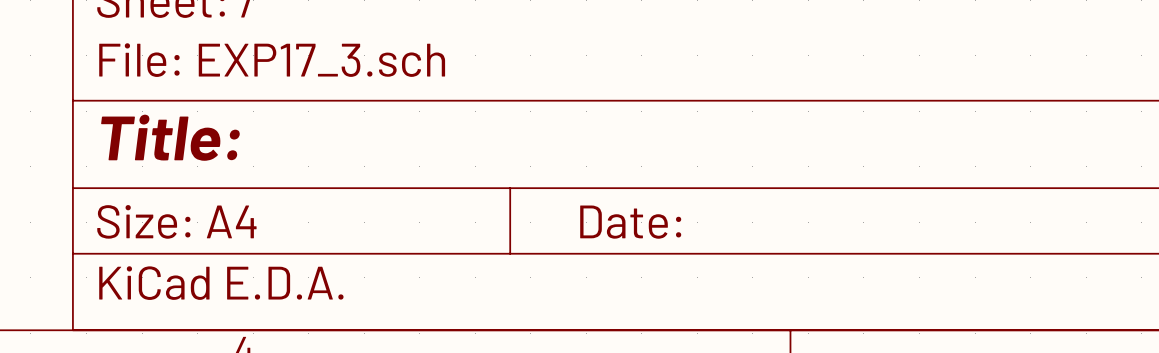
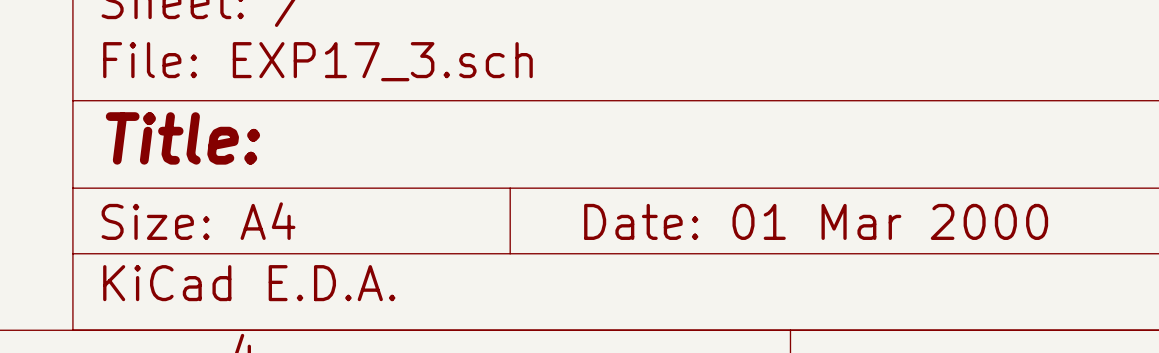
title block: Date: (630, 222) -> Date: 01 Mar 2000 (816, 221)

